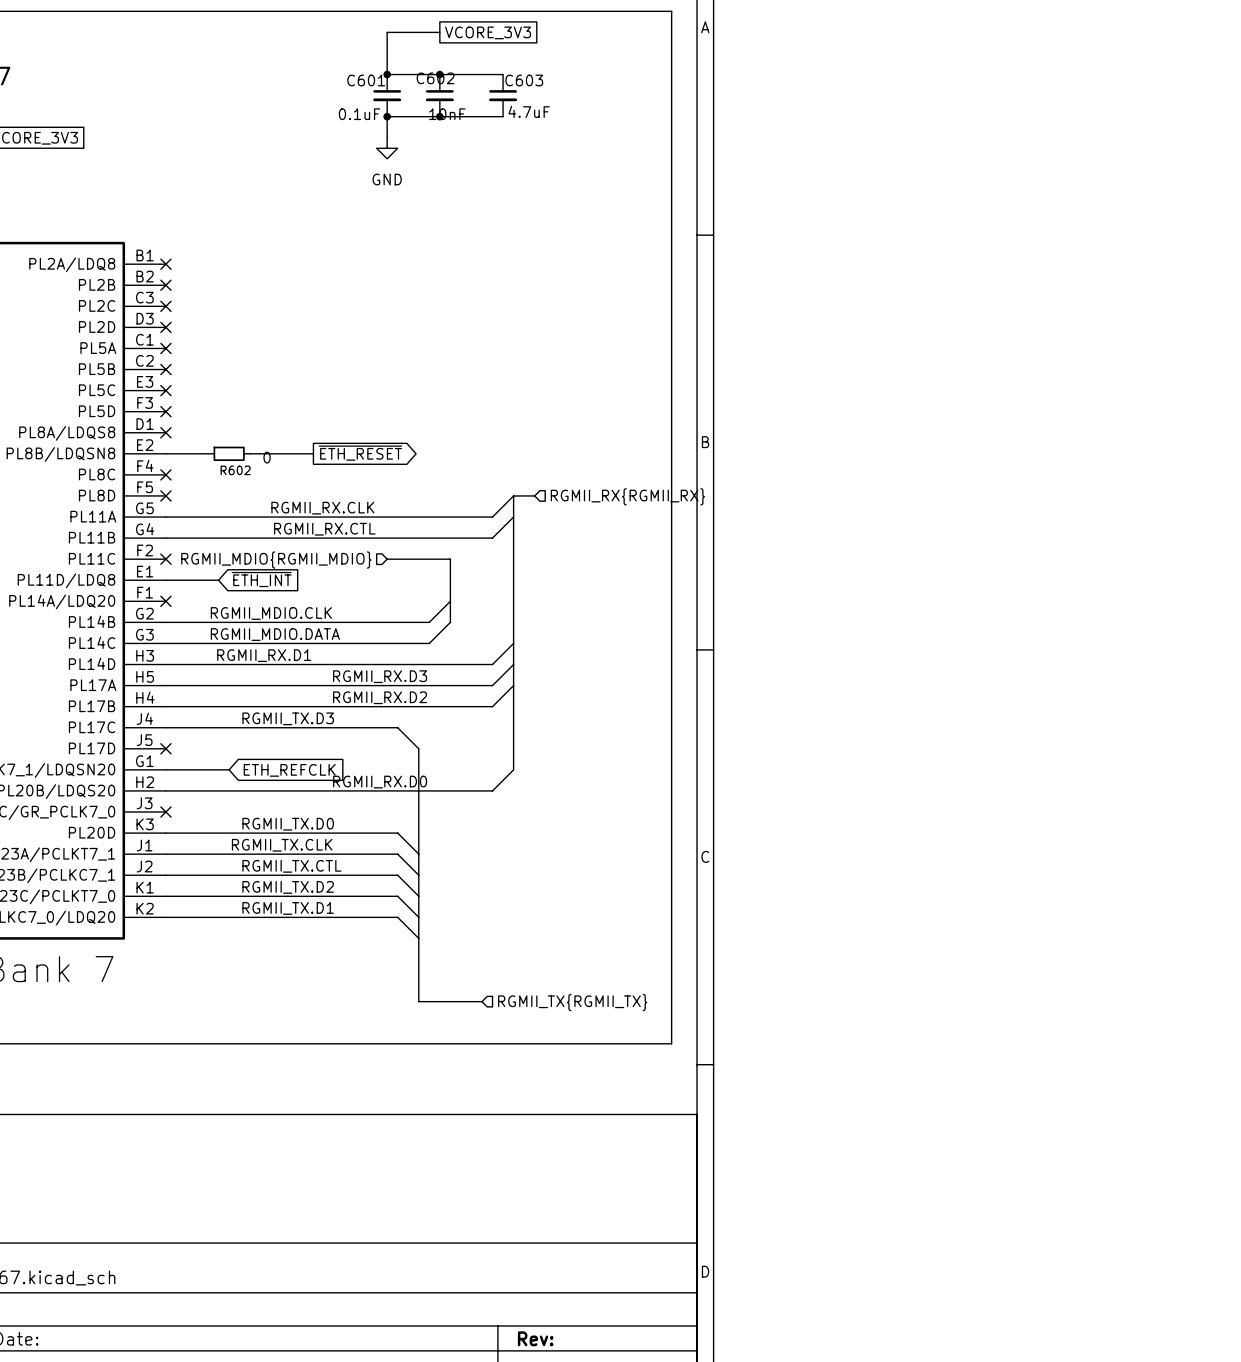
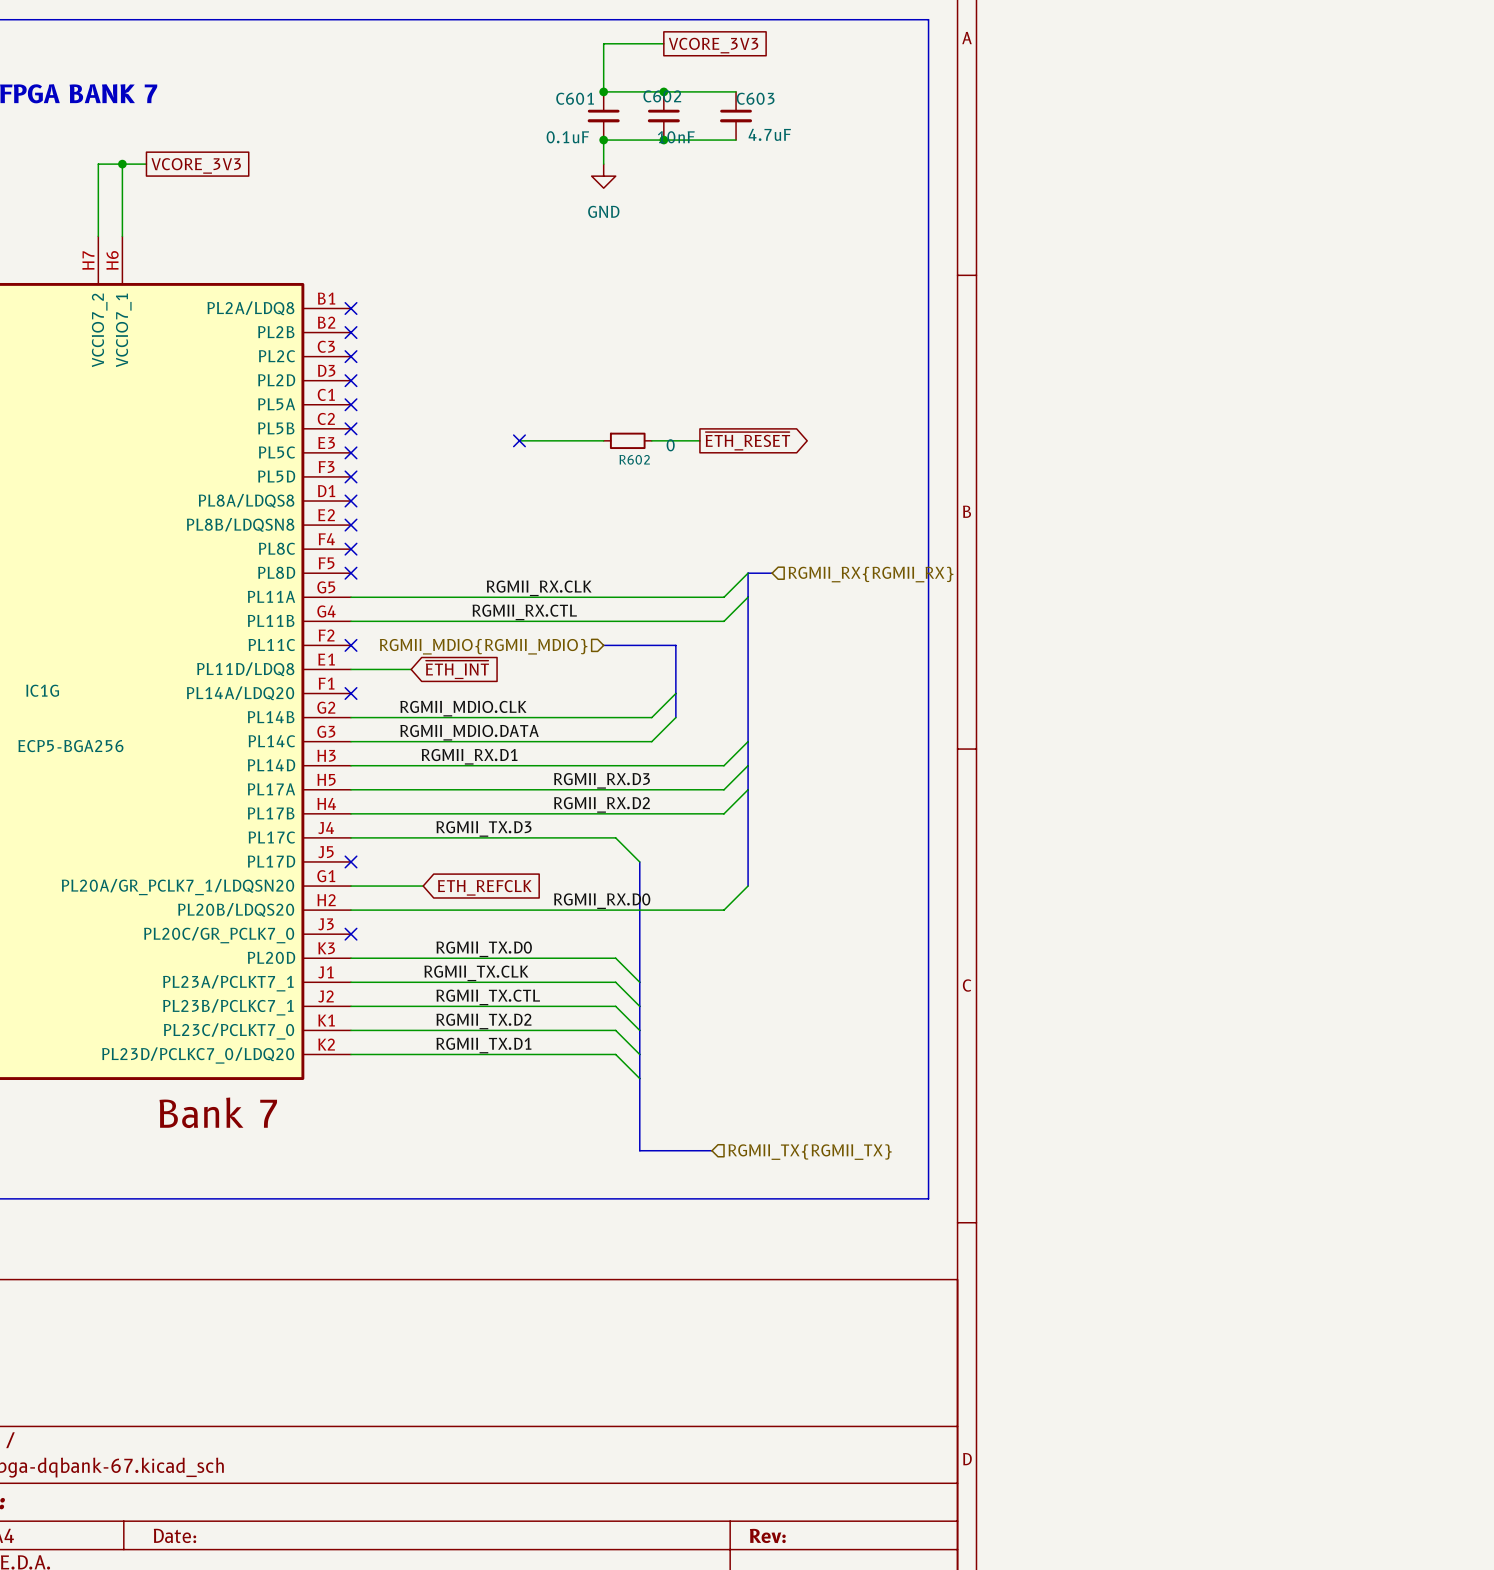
wire: none -> (519, 440) (603, 440)
no-connect mark: none -> (519, 440)
wire: none -> (651, 440) (699, 440)
wire: (165, 453) (208, 453) -> none
no-connect mark: none -> (351, 525)
R602 position: (229, 453) -> (627, 440)
wire: (250, 453) (313, 453) -> none
global label position: ~{ETH_RESET} (360, 453) -> ~{ETH_RESET} (747, 441)

